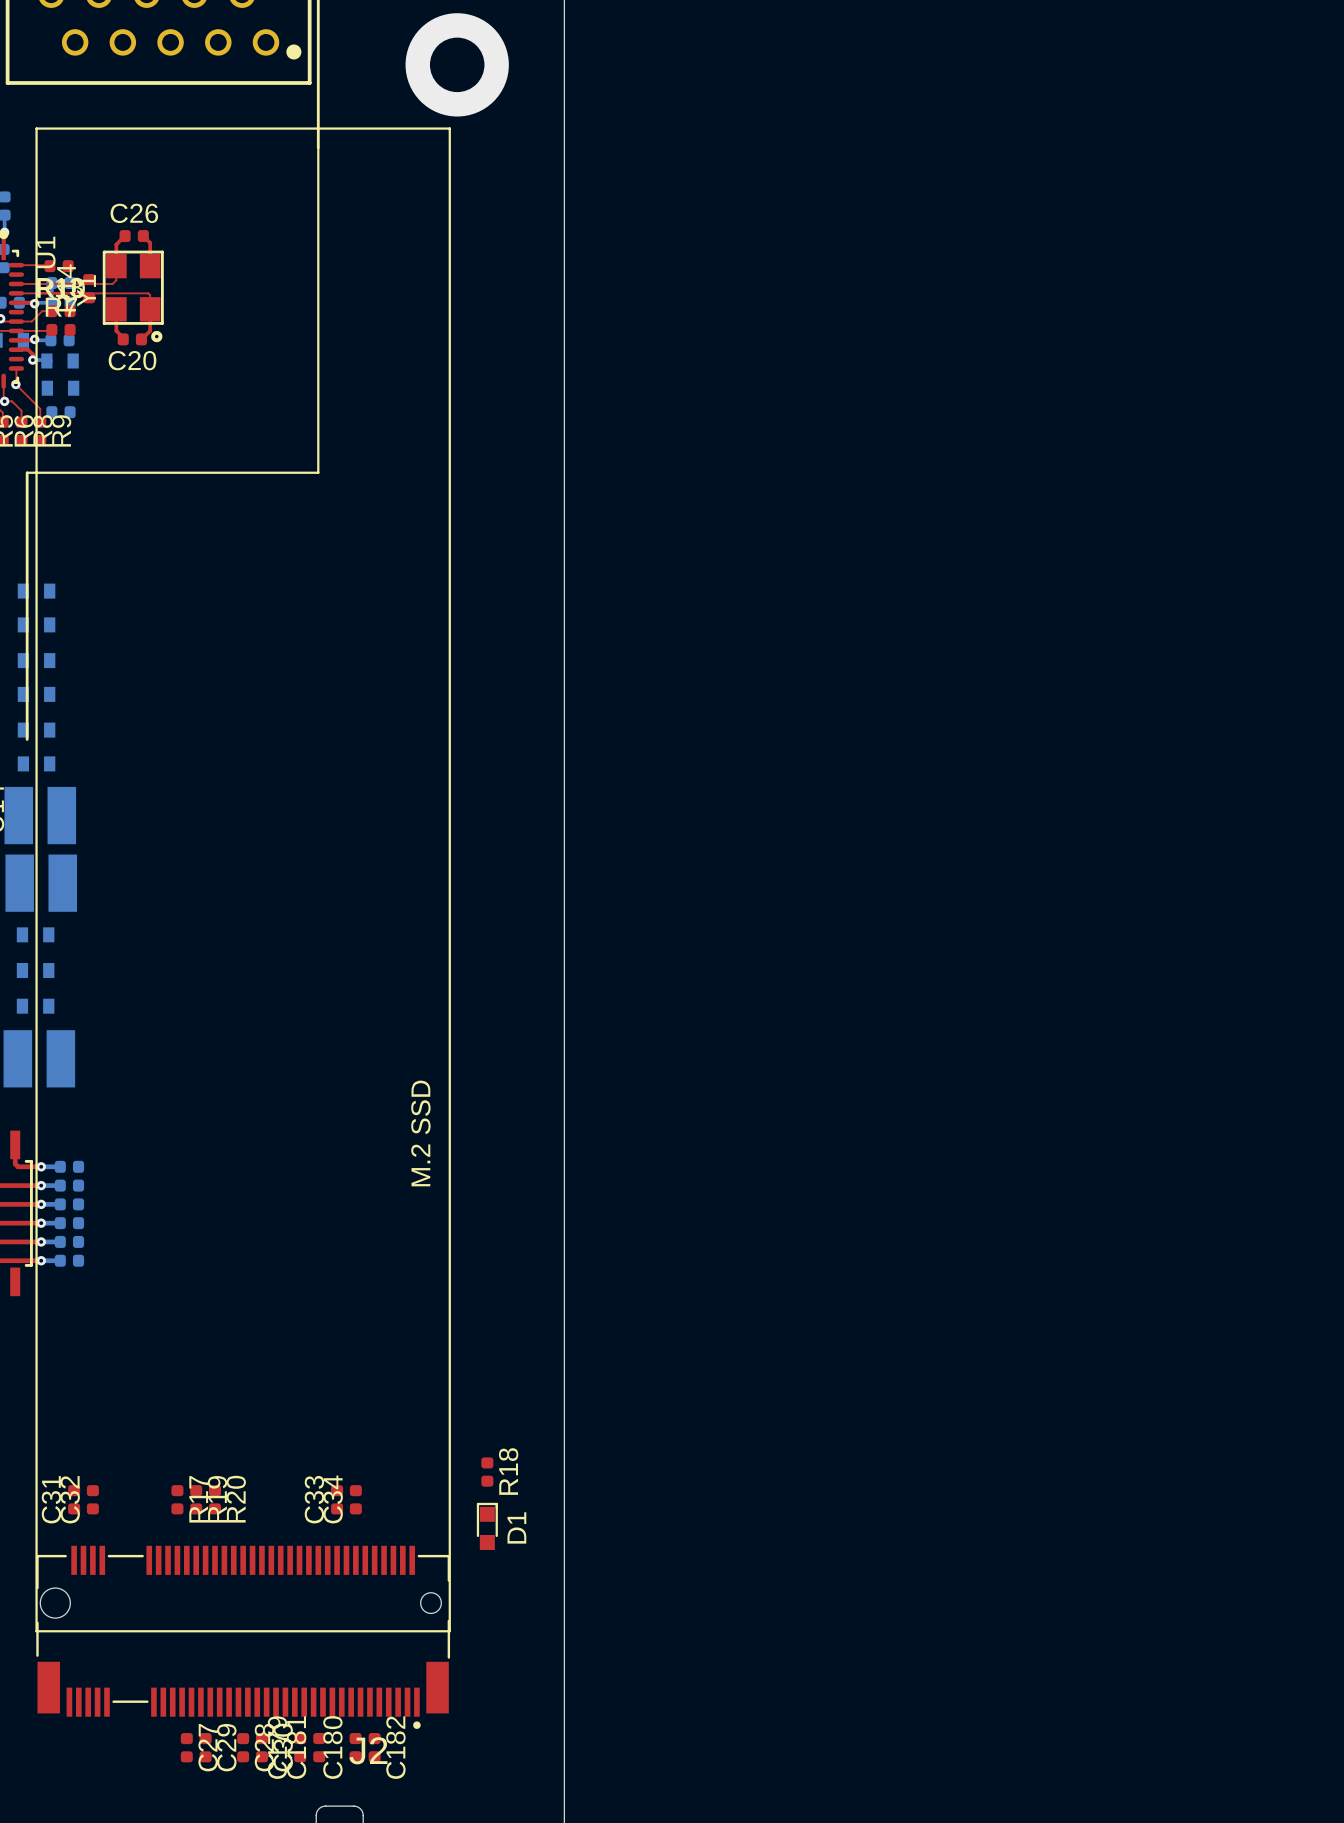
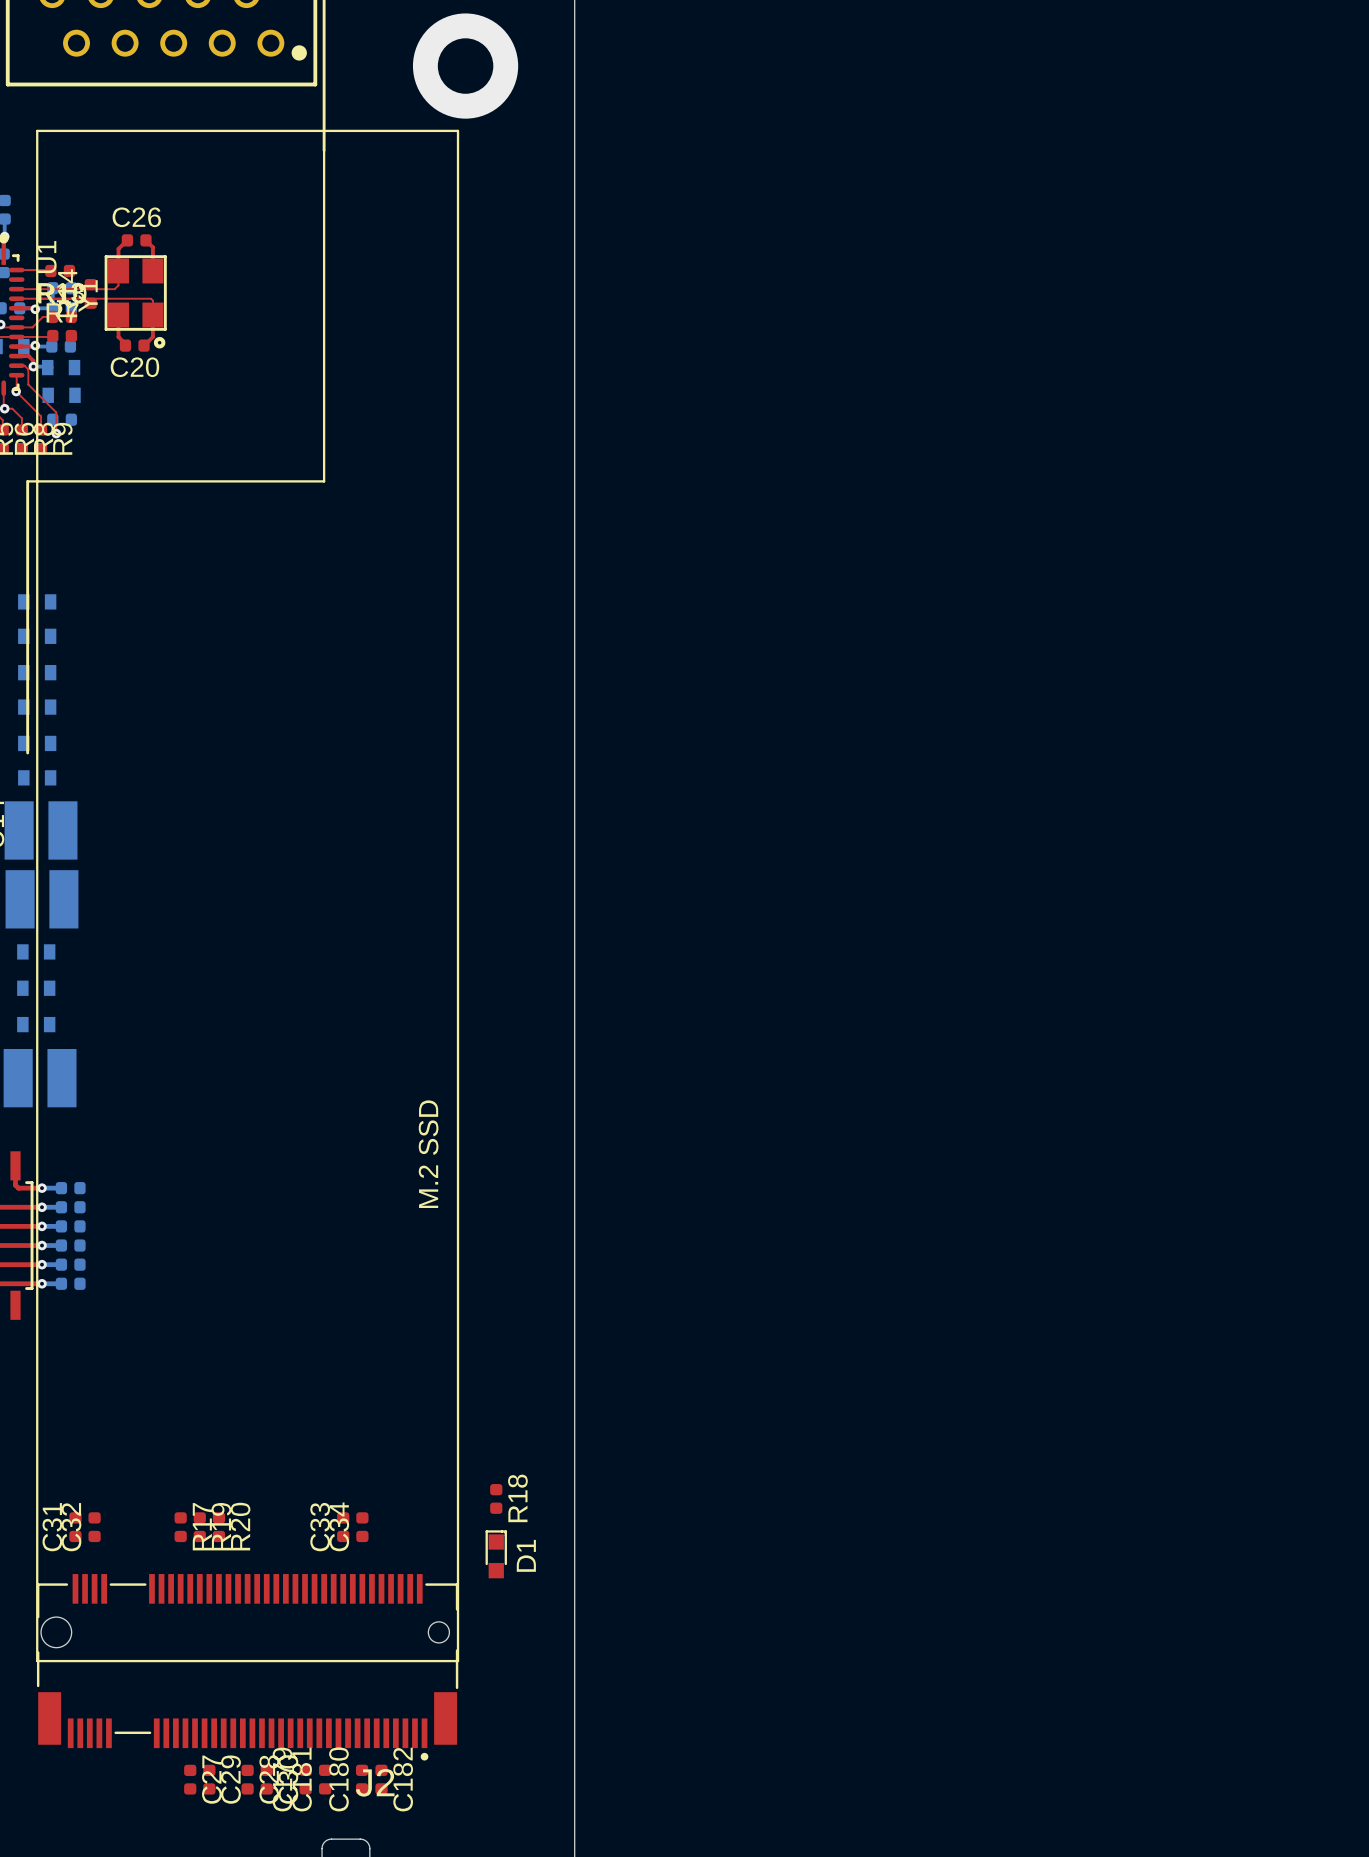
top track: none -> (16, 365) (24, 365) (28, 369) (28, 384) (56, 412) (56, 433)
via: none -> (56, 433)

